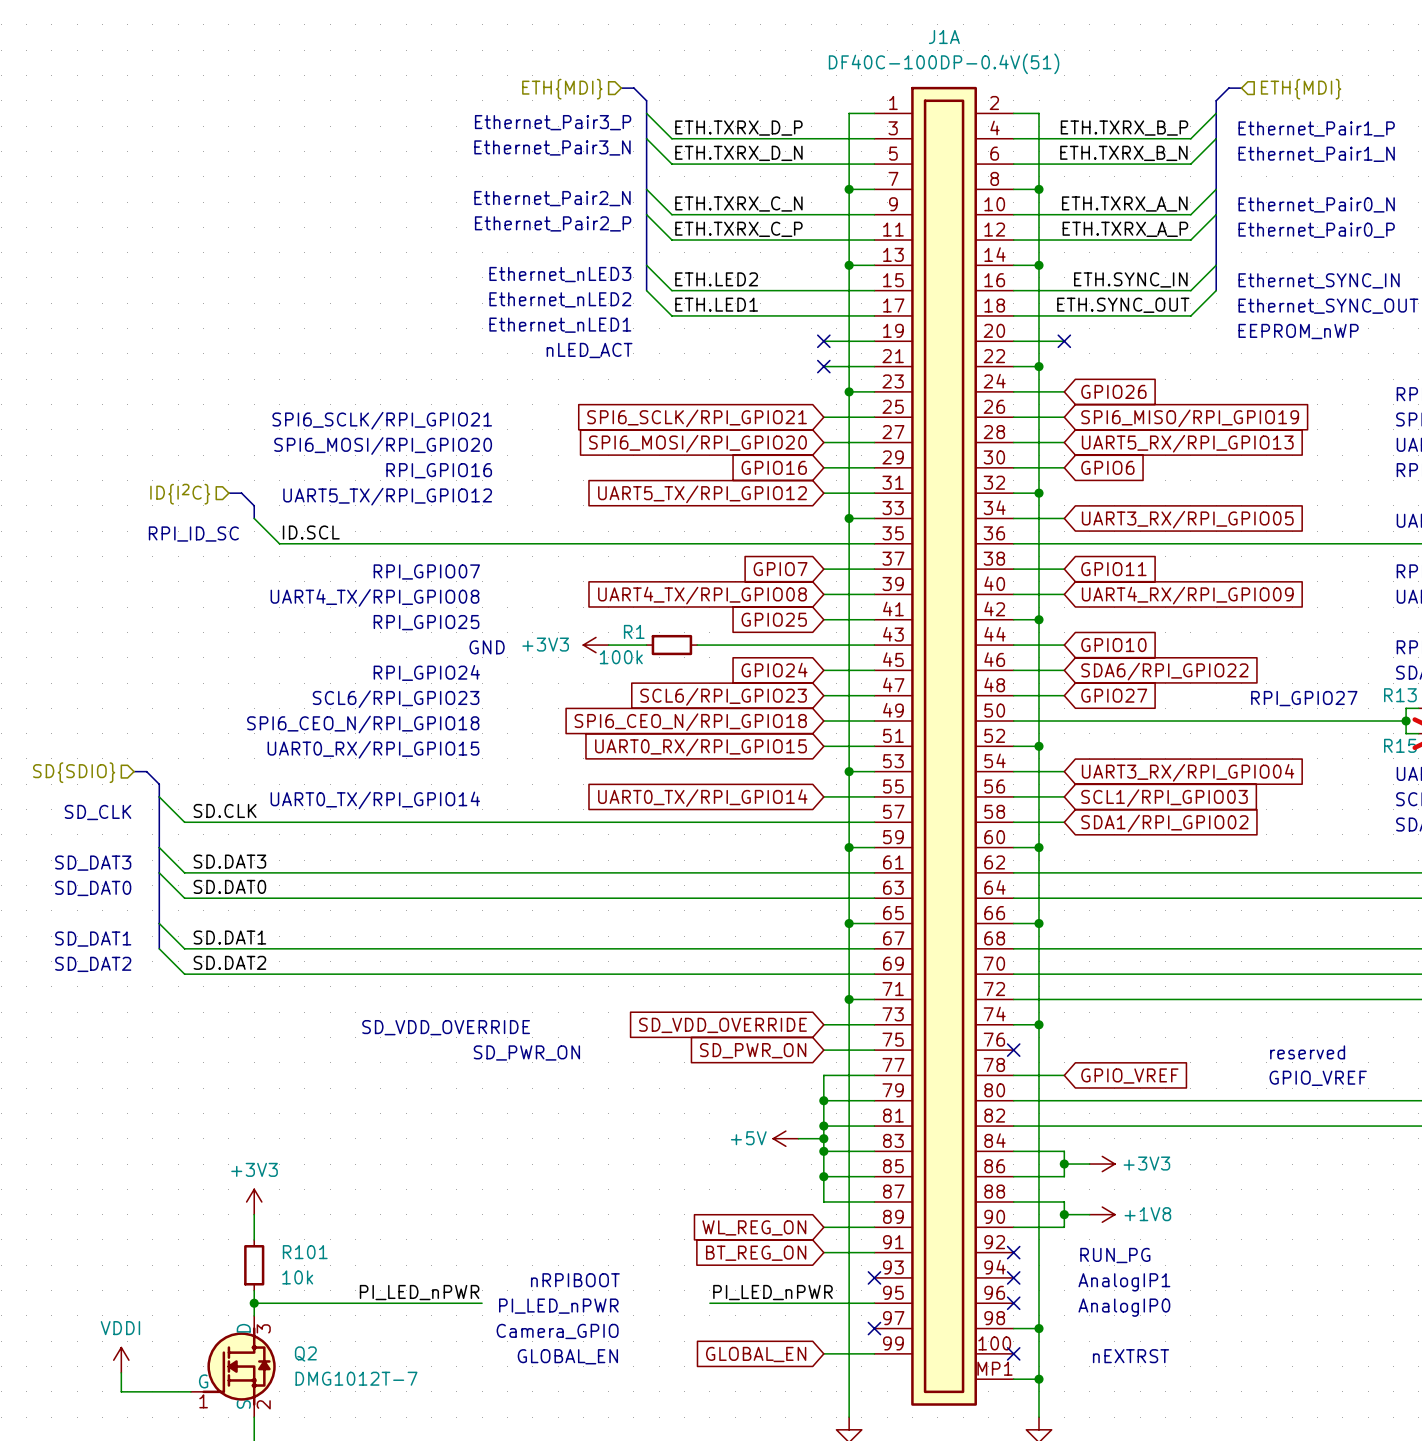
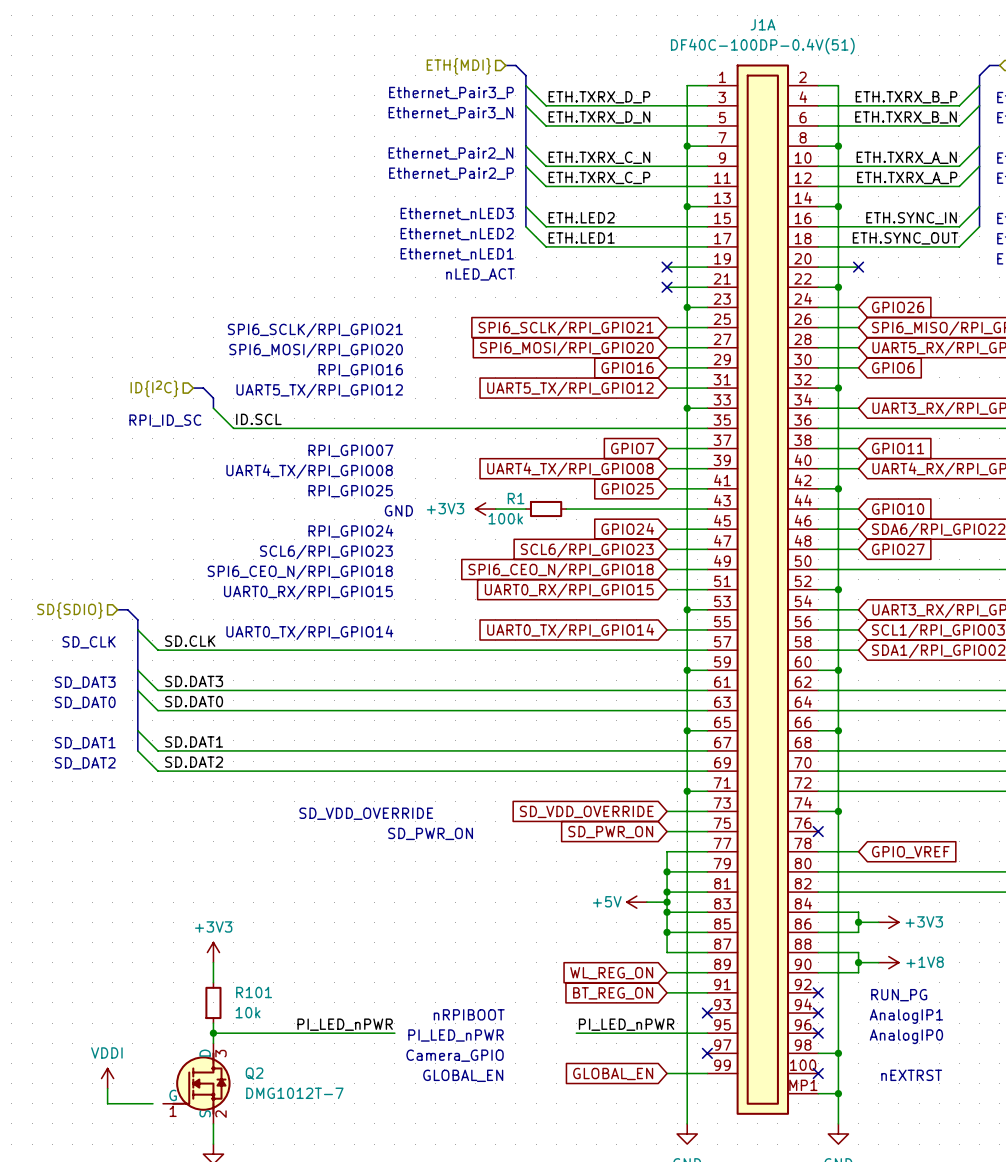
wire: (178, 1391) (190, 1391) -> none

